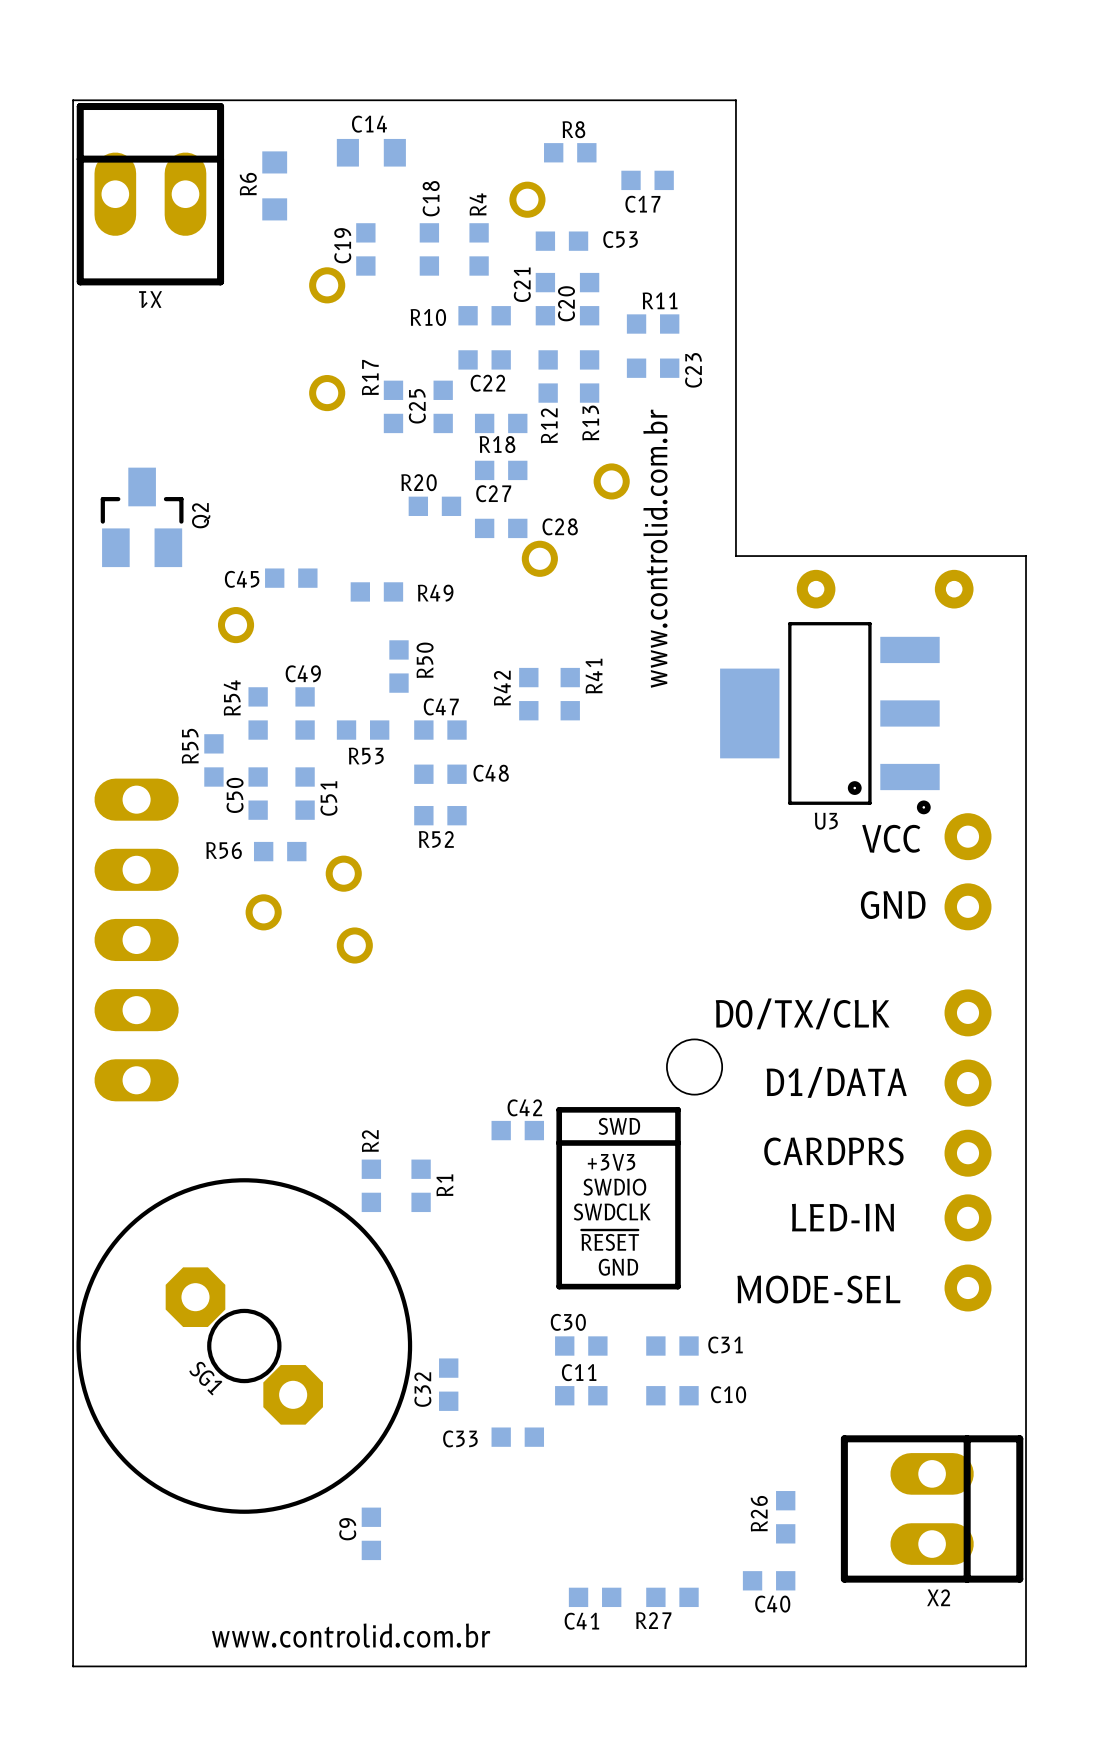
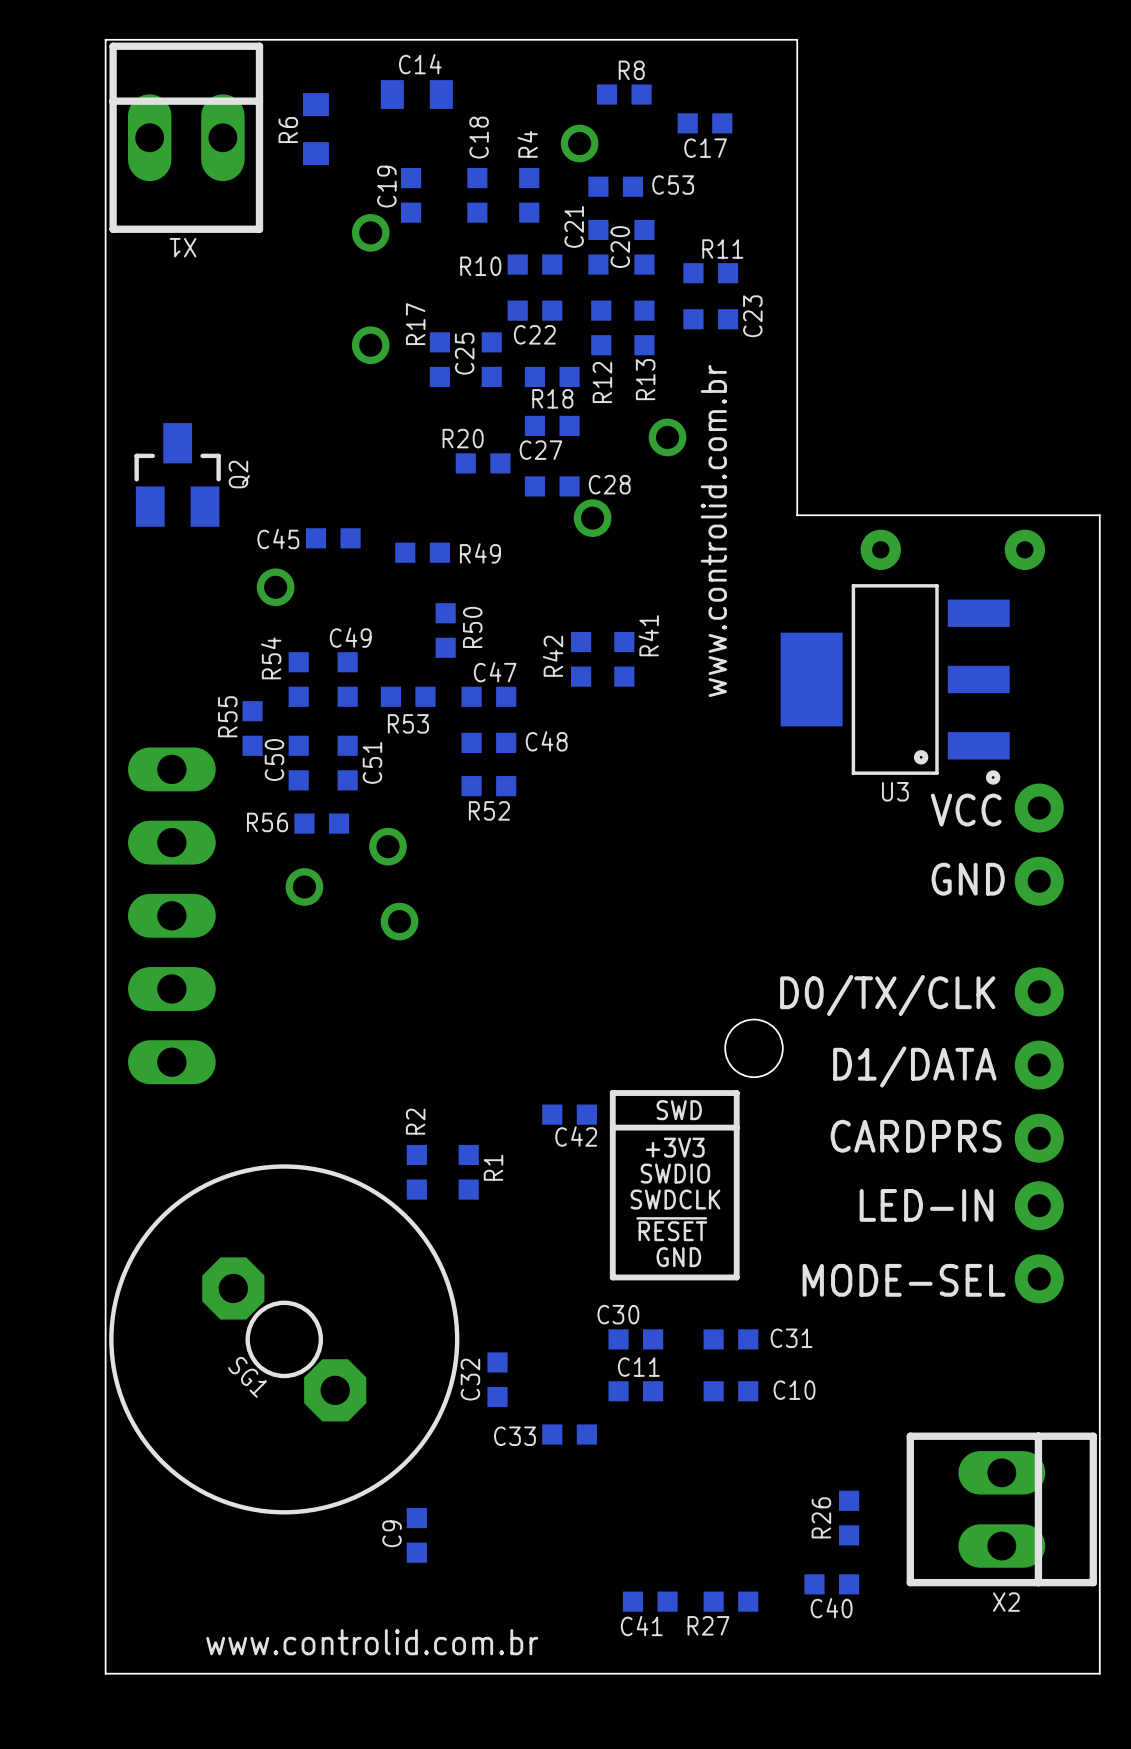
C42 name position: C42 (524, 1107) -> C42 (576, 1136)

